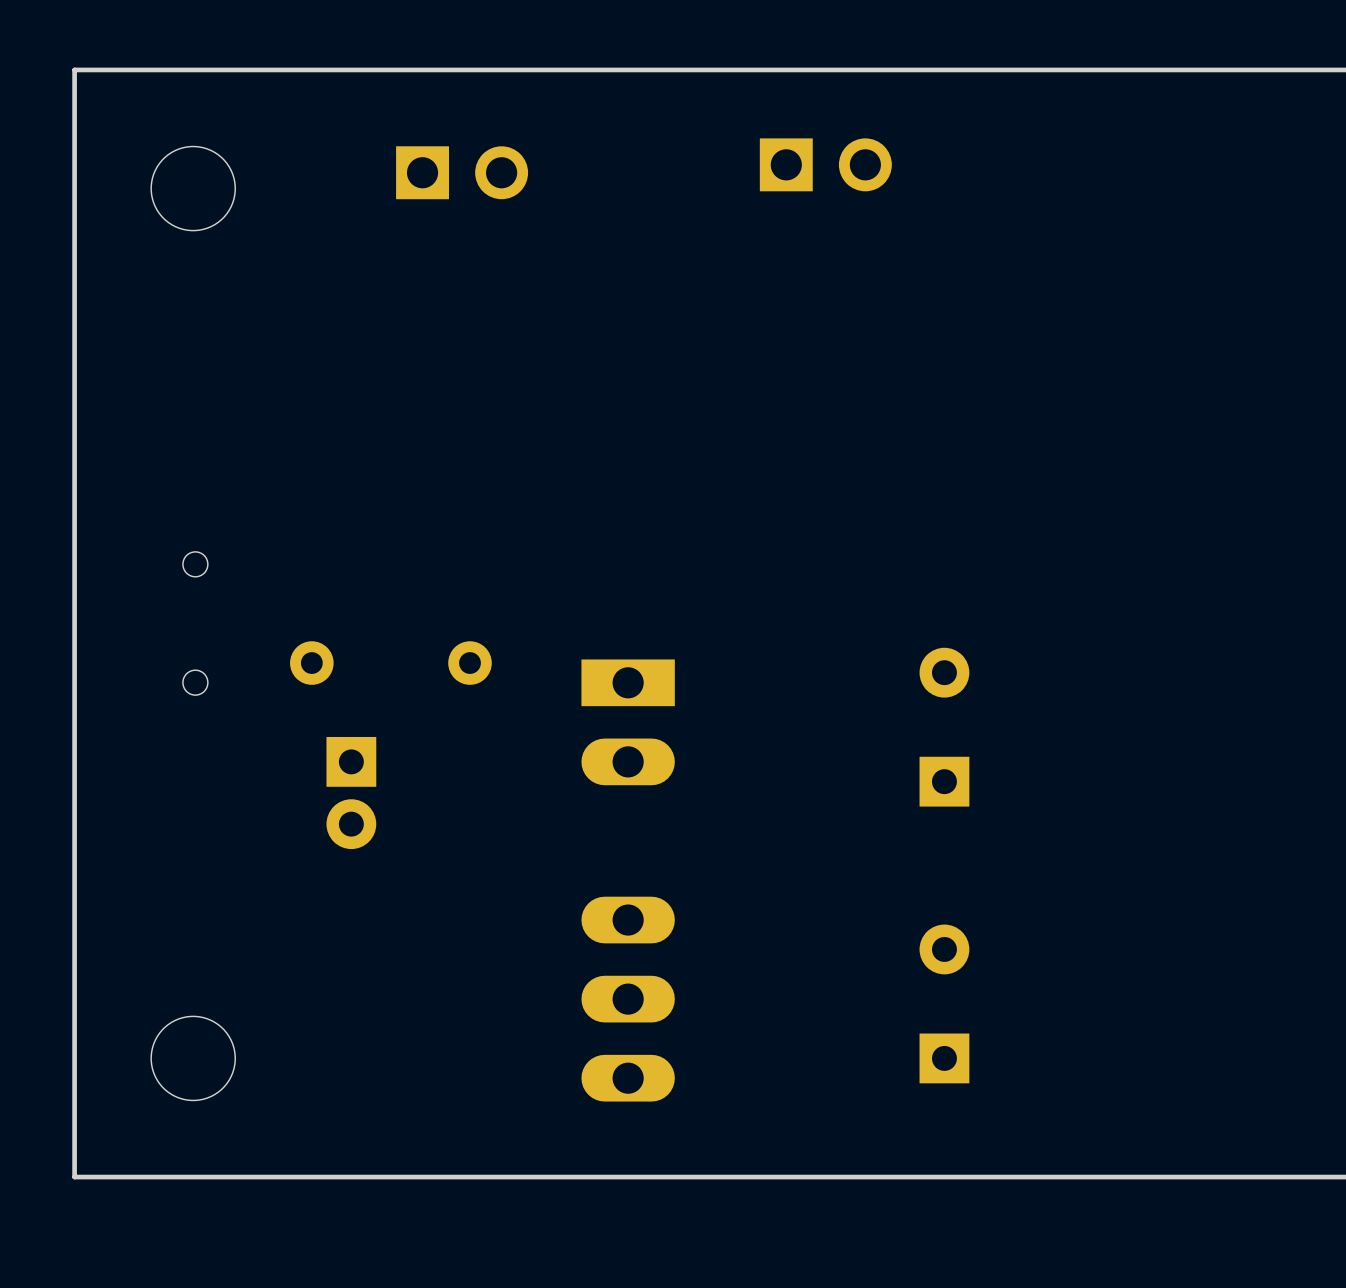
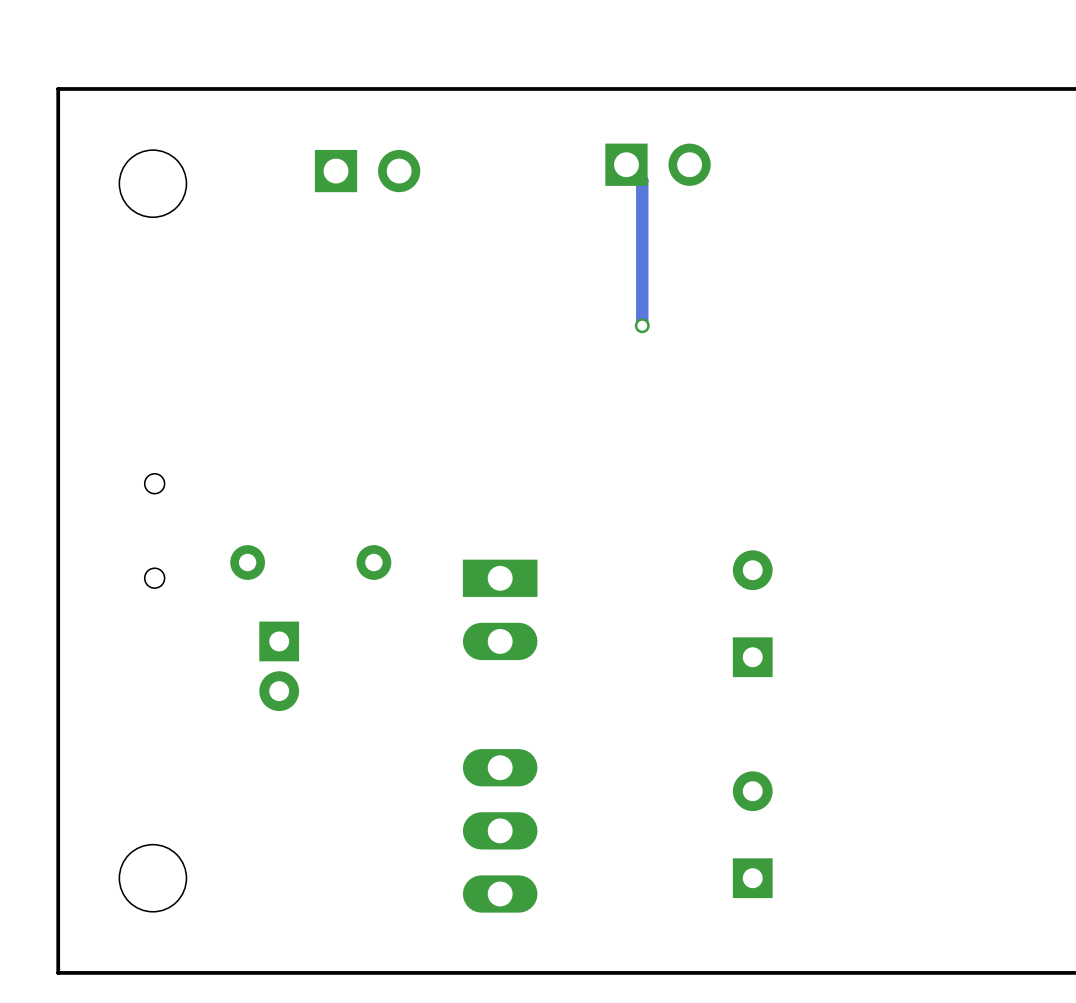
track: none -> (626, 164) (642, 180) (642, 325)
via: none -> (642, 325)

